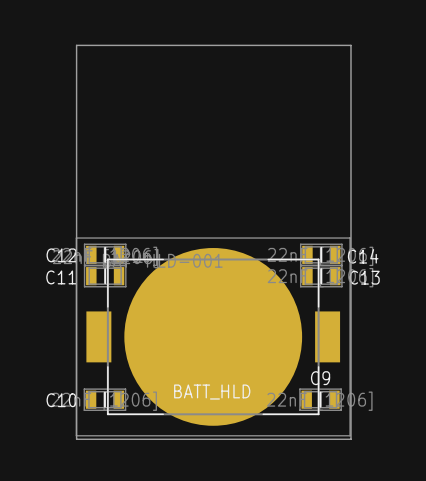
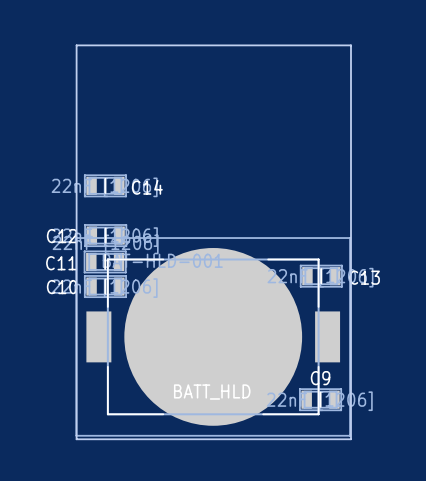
C12 position: (105, 254) -> (105, 235)
C14 position: (321, 254) -> (105, 185)
C11 position: (105, 276) -> (105, 261)
C10 position: (104, 399) -> (105, 286)

